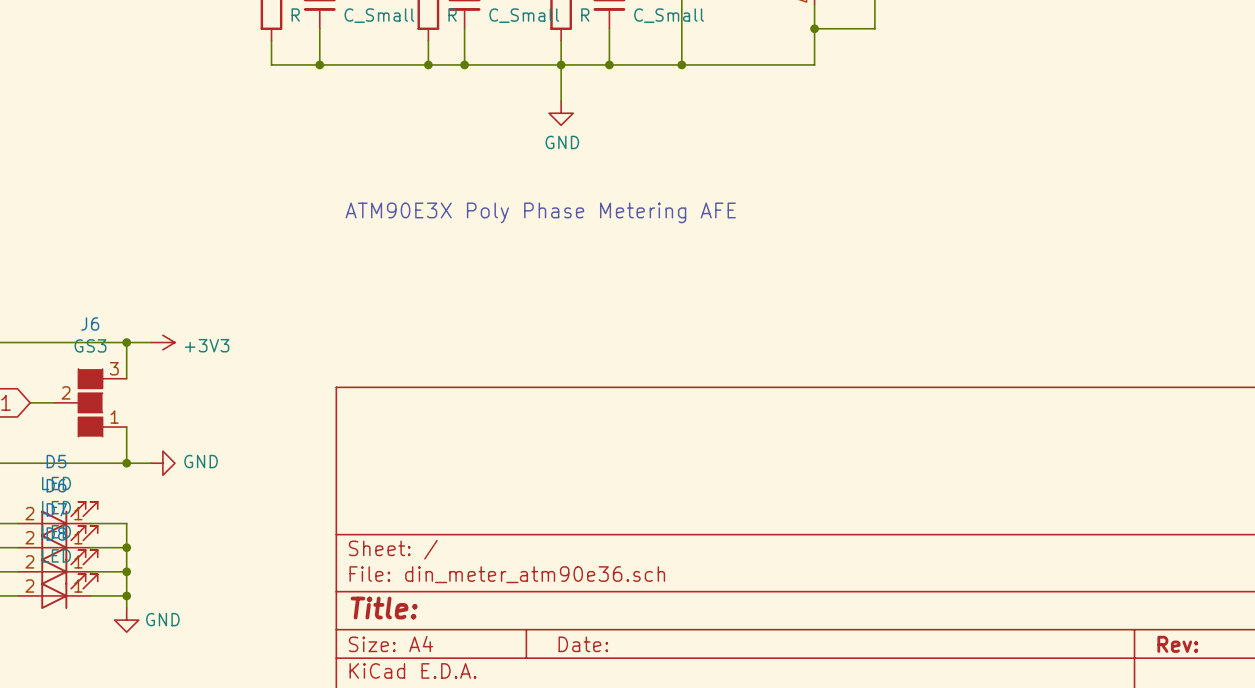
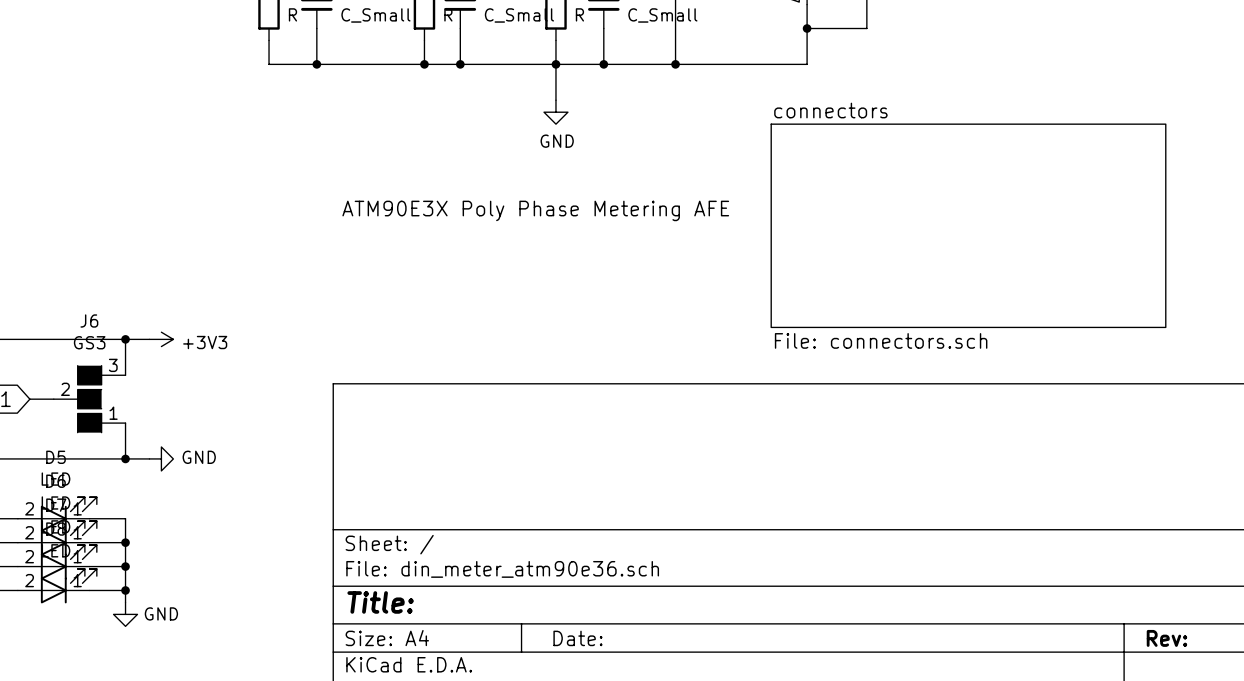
sheet connectors: none -> File: connectors.sch (968, 225)

